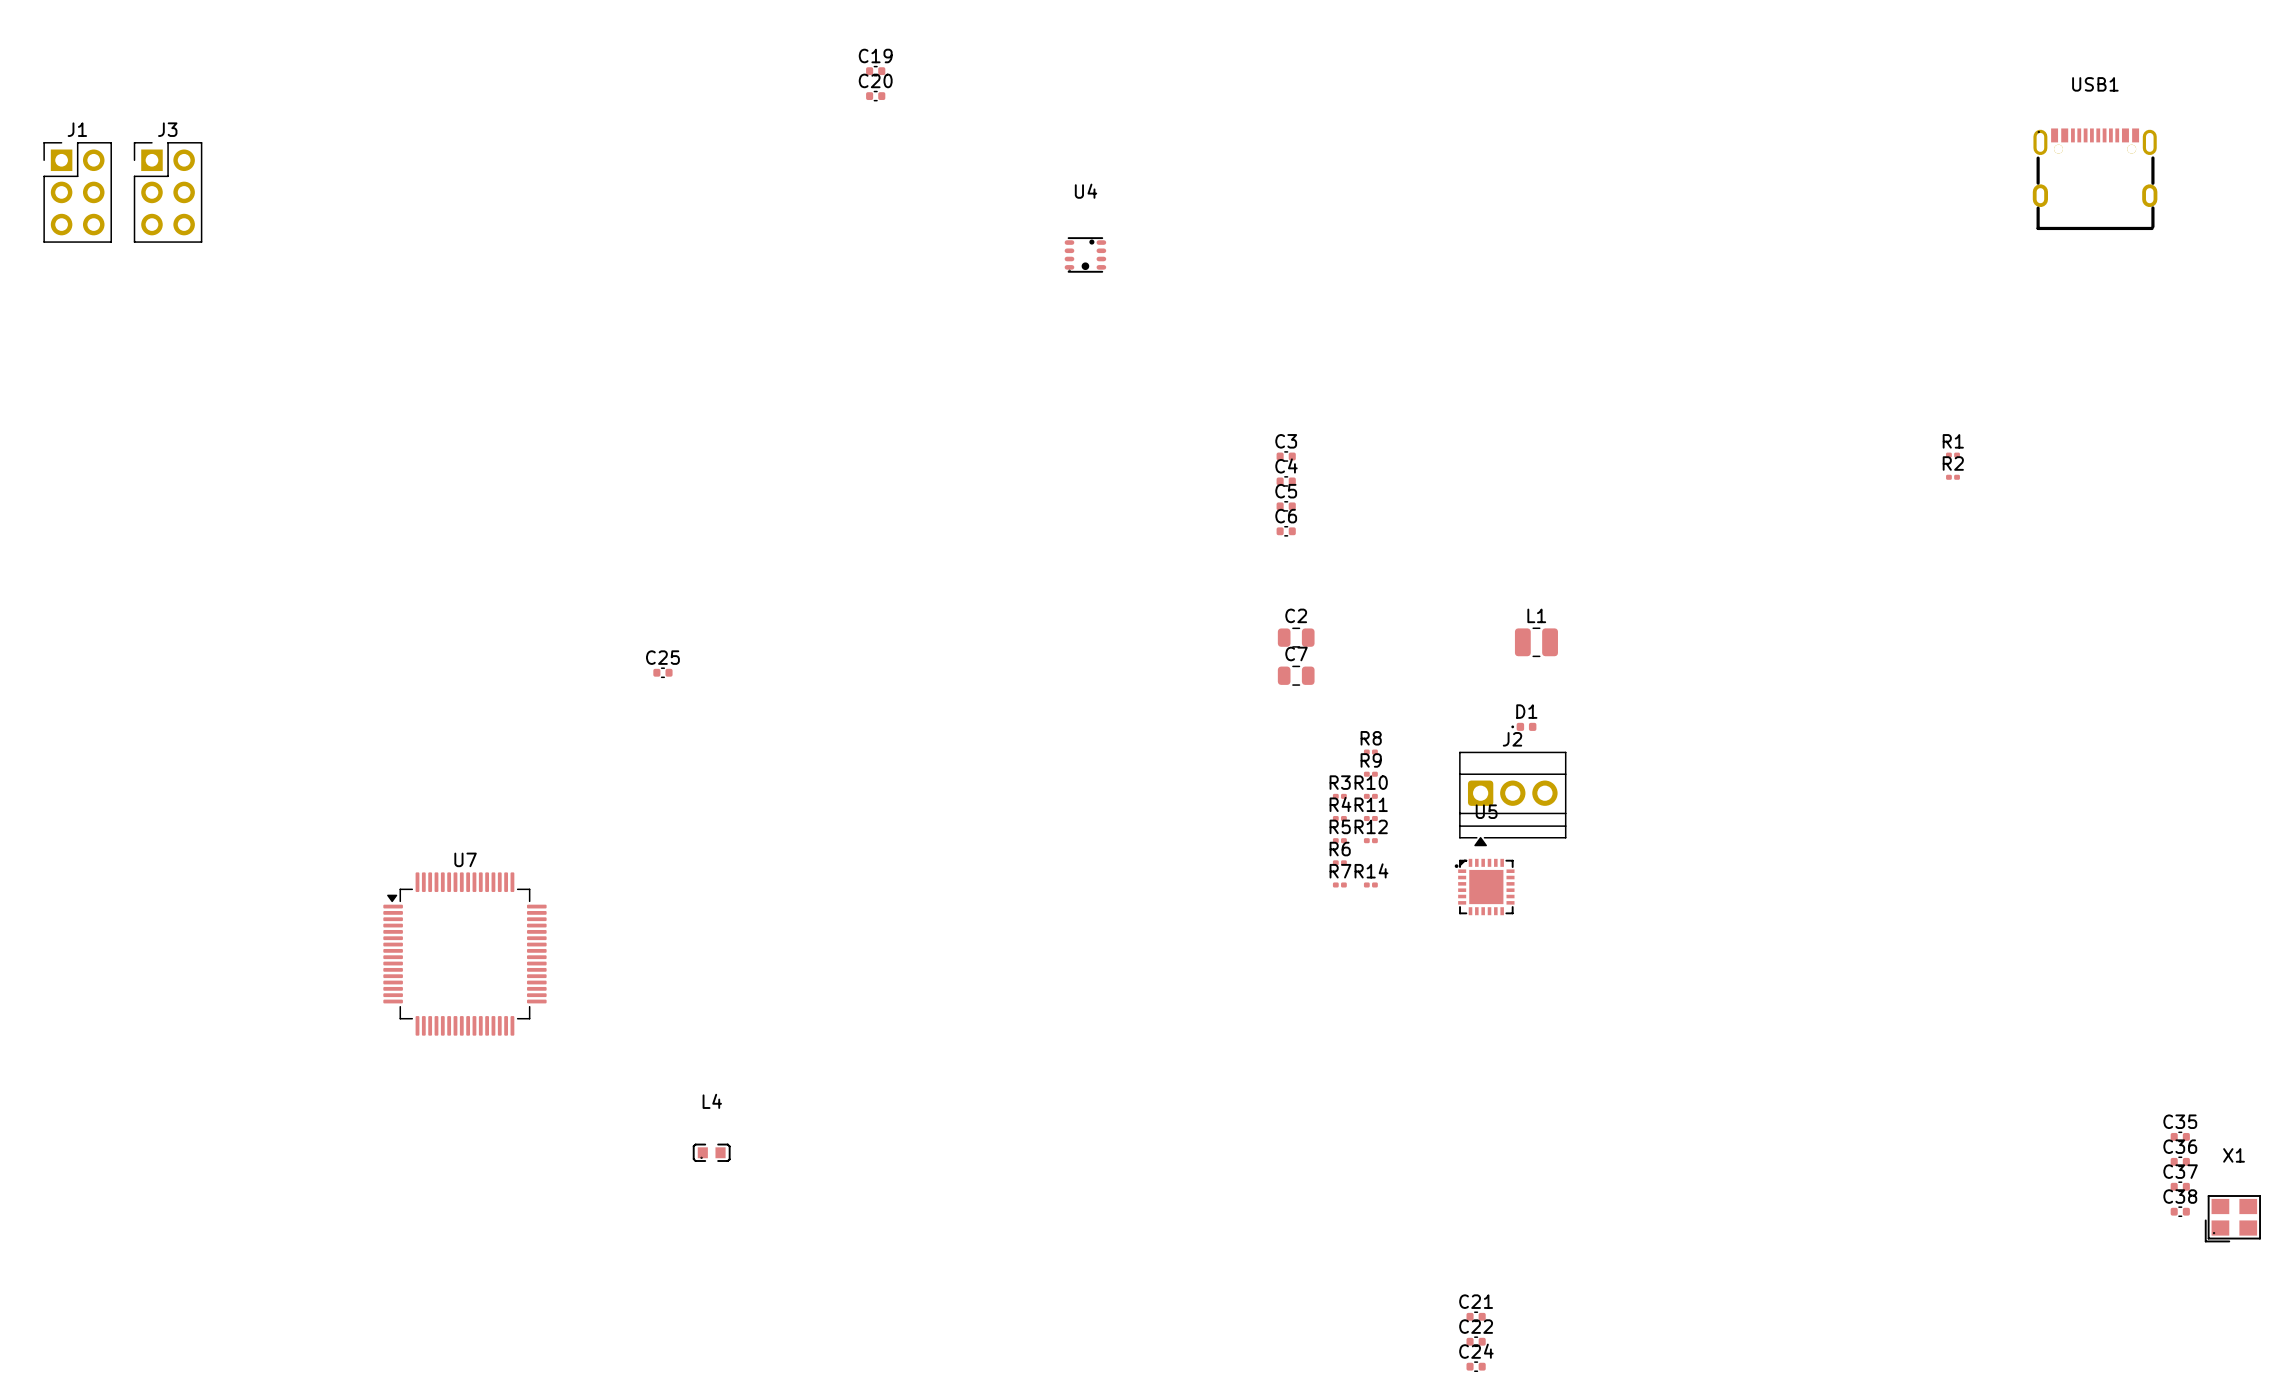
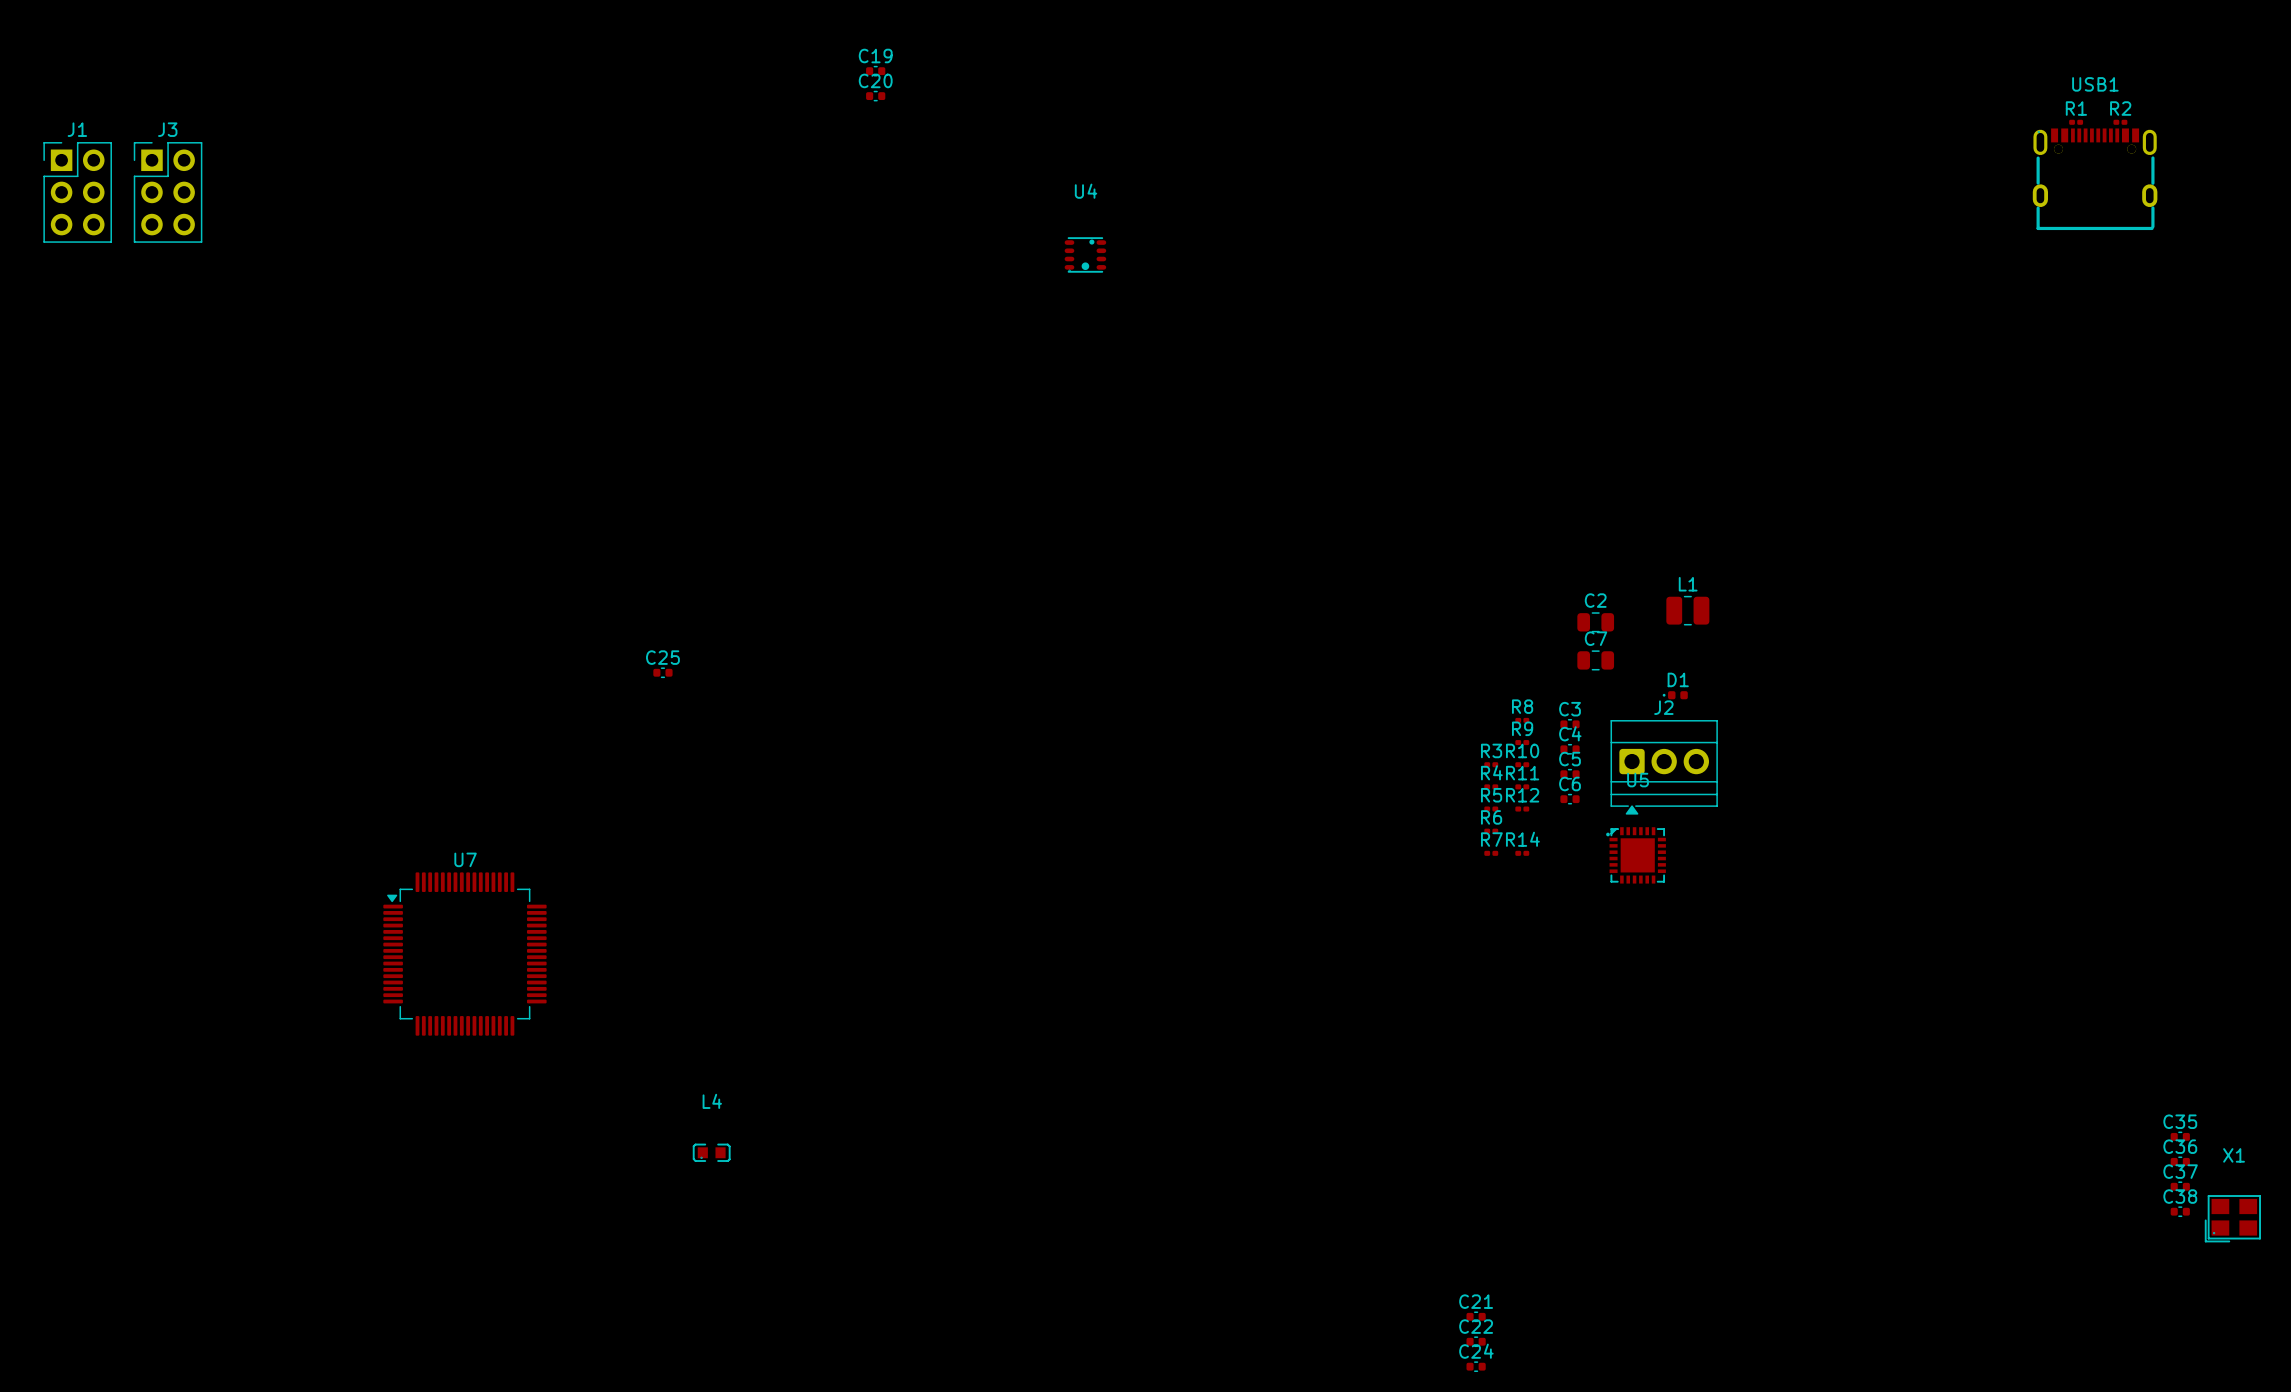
R1 position: (1952, 455) -> (2076, 122)
C3 position: (1286, 456) -> (1570, 724)
R2 position: (1952, 477) -> (2120, 122)
C4 position: (1286, 481) -> (1570, 749)
C5 position: (1286, 506) -> (1570, 774)
C6 position: (1286, 531) -> (1570, 799)
C2 position: (1296, 637) -> (1595, 622)
L1 position: (1536, 642) -> (1687, 610)
C7 position: (1296, 675) -> (1595, 660)
D1 position: (1523, 726) -> (1675, 695)
R8 position: (1370, 752) -> (1522, 720)
R9 position: (1370, 774) -> (1522, 742)
R3 position: (1339, 796) -> (1491, 764)
R10 position: (1370, 796) -> (1522, 764)
J2 position: (1512, 798) -> (1664, 767)
R4 position: (1339, 818) -> (1491, 786)
R11 position: (1370, 818) -> (1522, 786)
R5 position: (1339, 840) -> (1491, 809)
R12 position: (1370, 840) -> (1522, 809)
R6 position: (1339, 862) -> (1491, 831)
R7 position: (1339, 884) -> (1491, 853)
R14 position: (1370, 884) -> (1522, 853)
U5 position: (1484, 887) -> (1636, 855)

